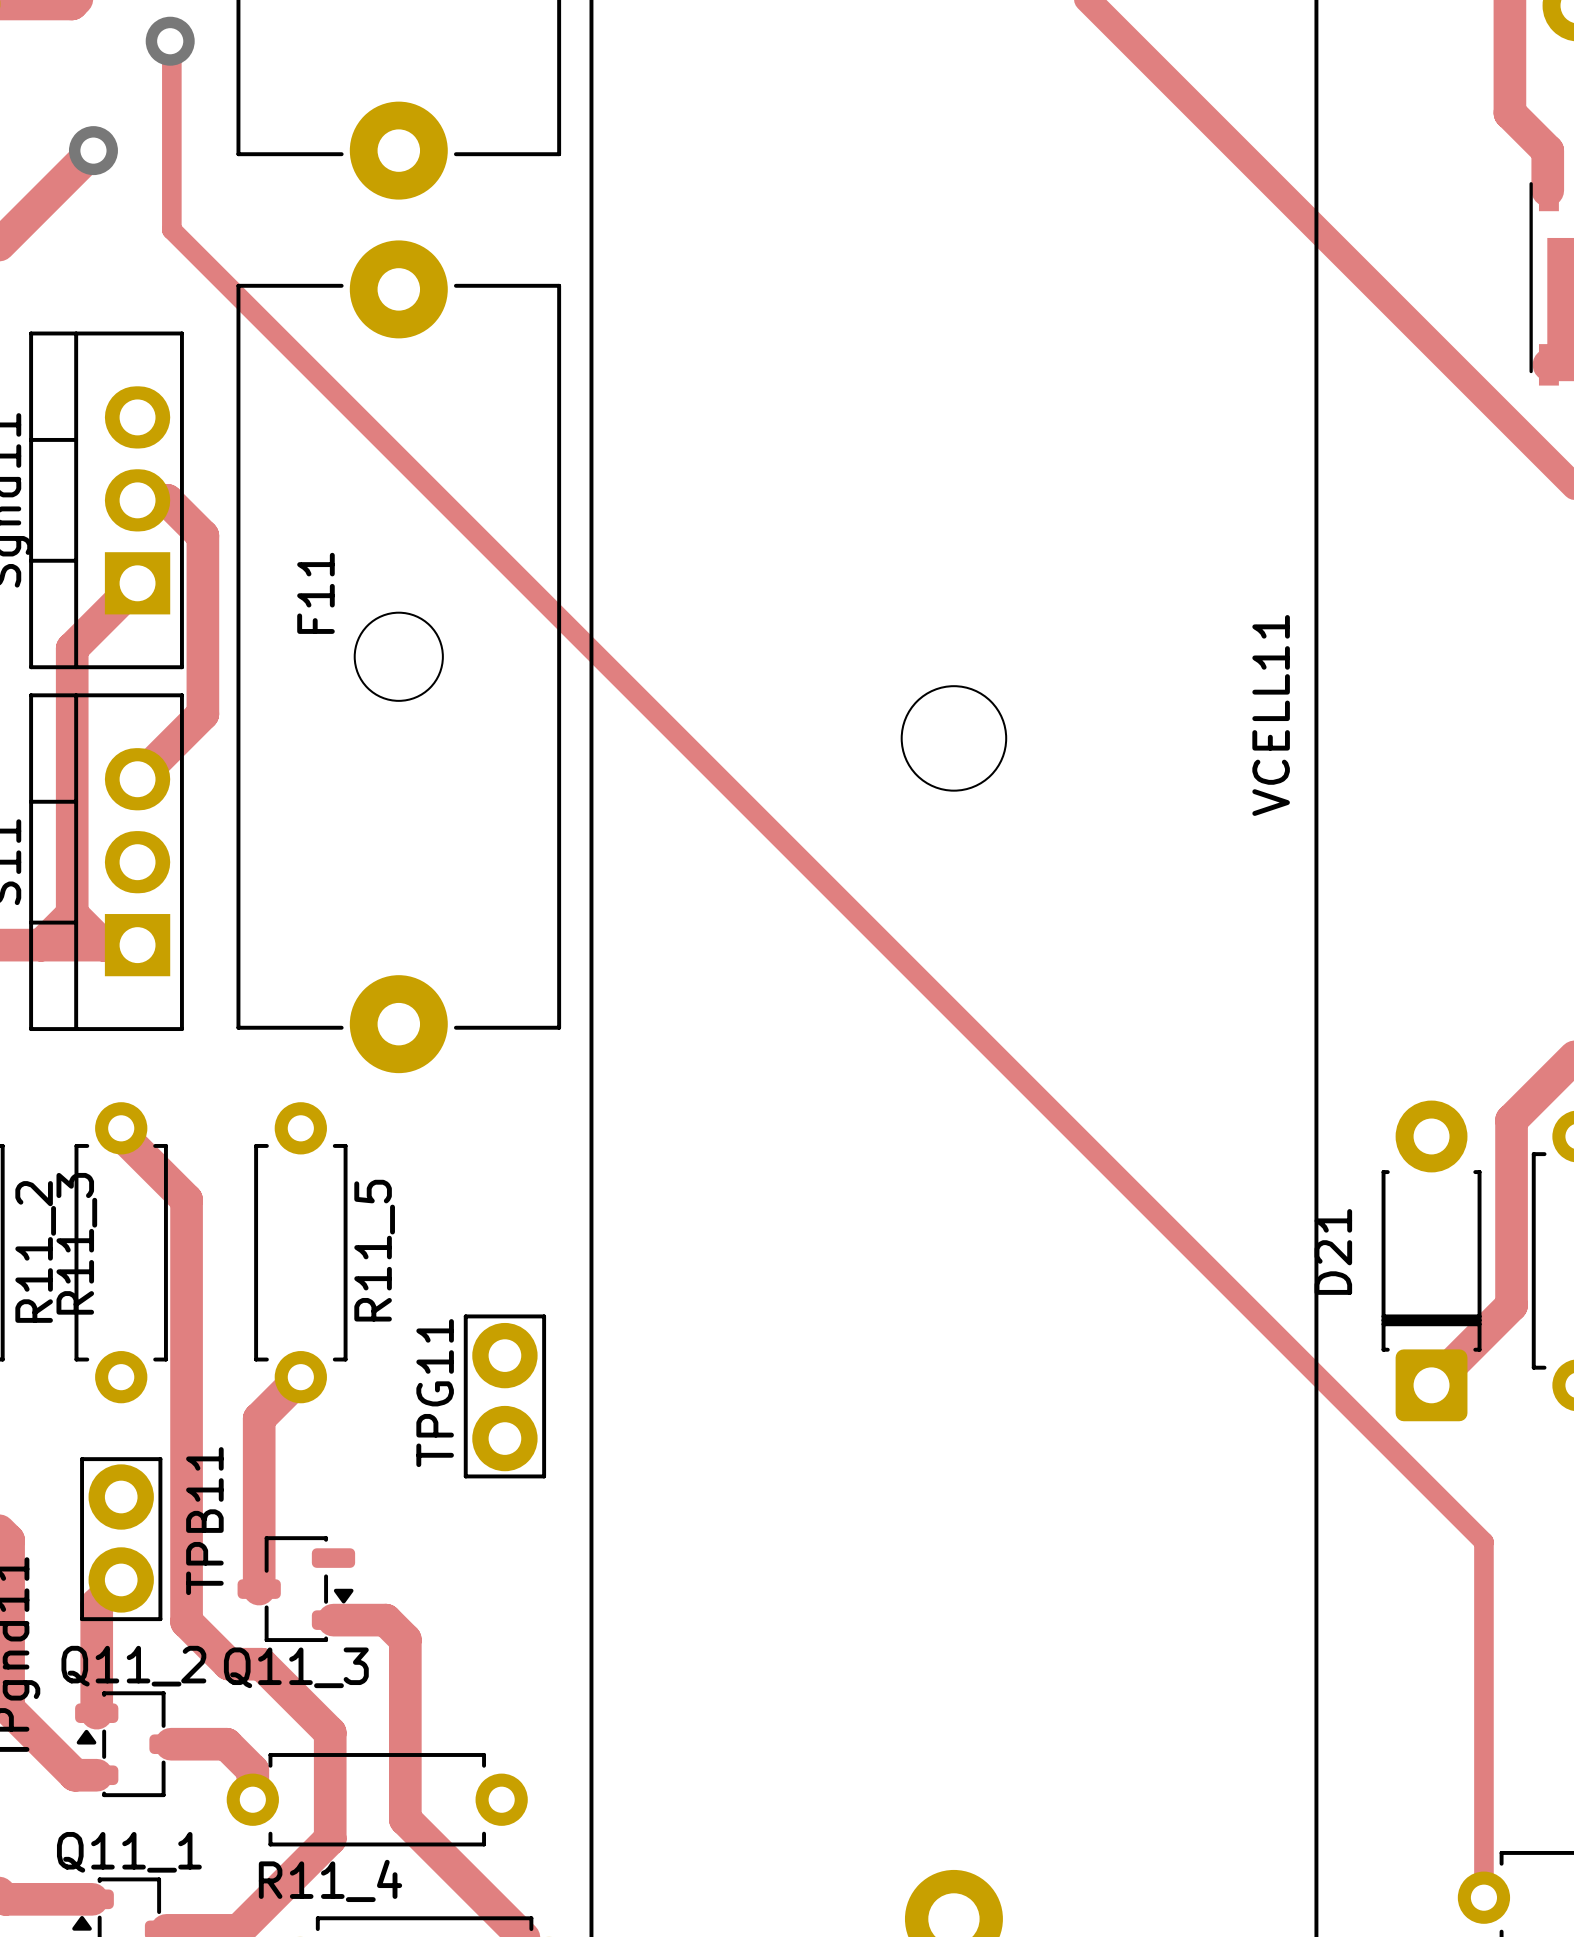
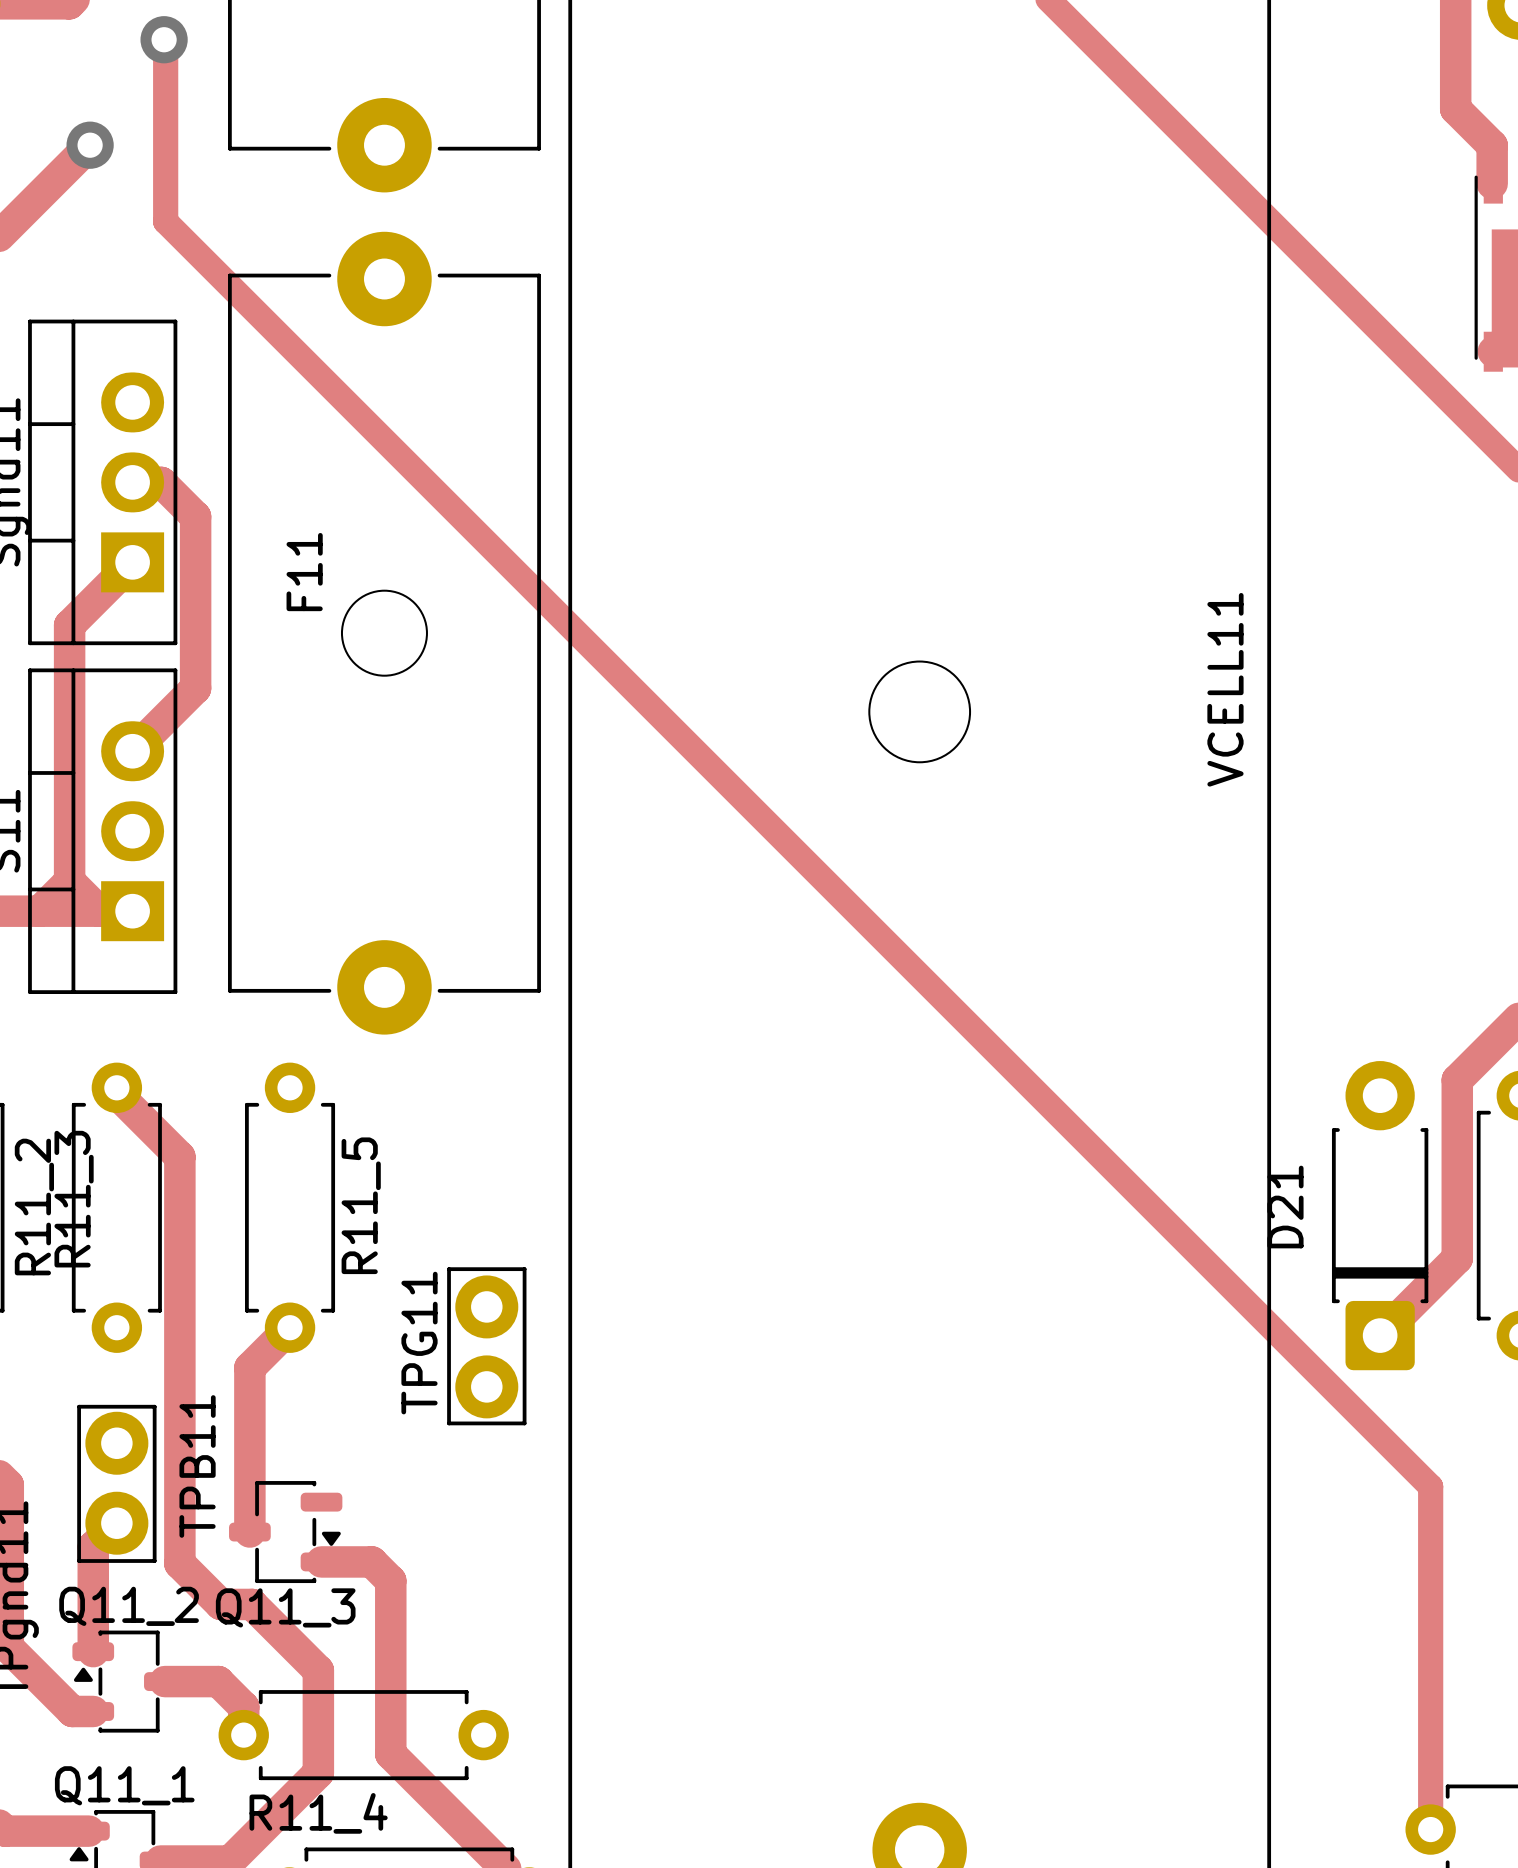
track width: thin (170, 41) (171, 42) (171, 229) (1483, 1542) (1483, 1897) -> thick (164, 39) (165, 41) (165, 221) (1430, 1486) (1430, 1829)

